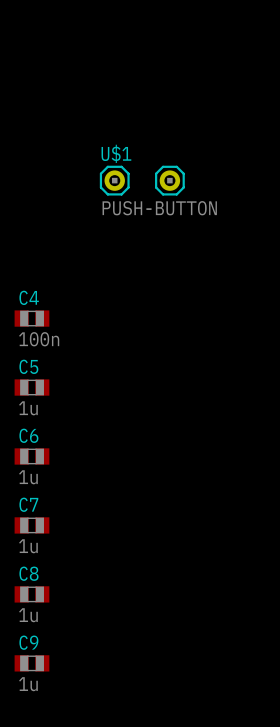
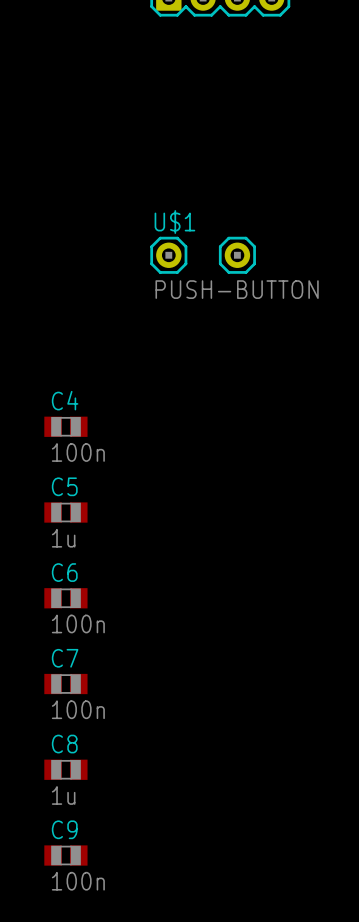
C6 value: 1u (28, 477) -> 100n (78, 623)
C7 value: 1u (28, 546) -> 100n (78, 709)
C9 value: 1u (28, 684) -> 100n (78, 881)

